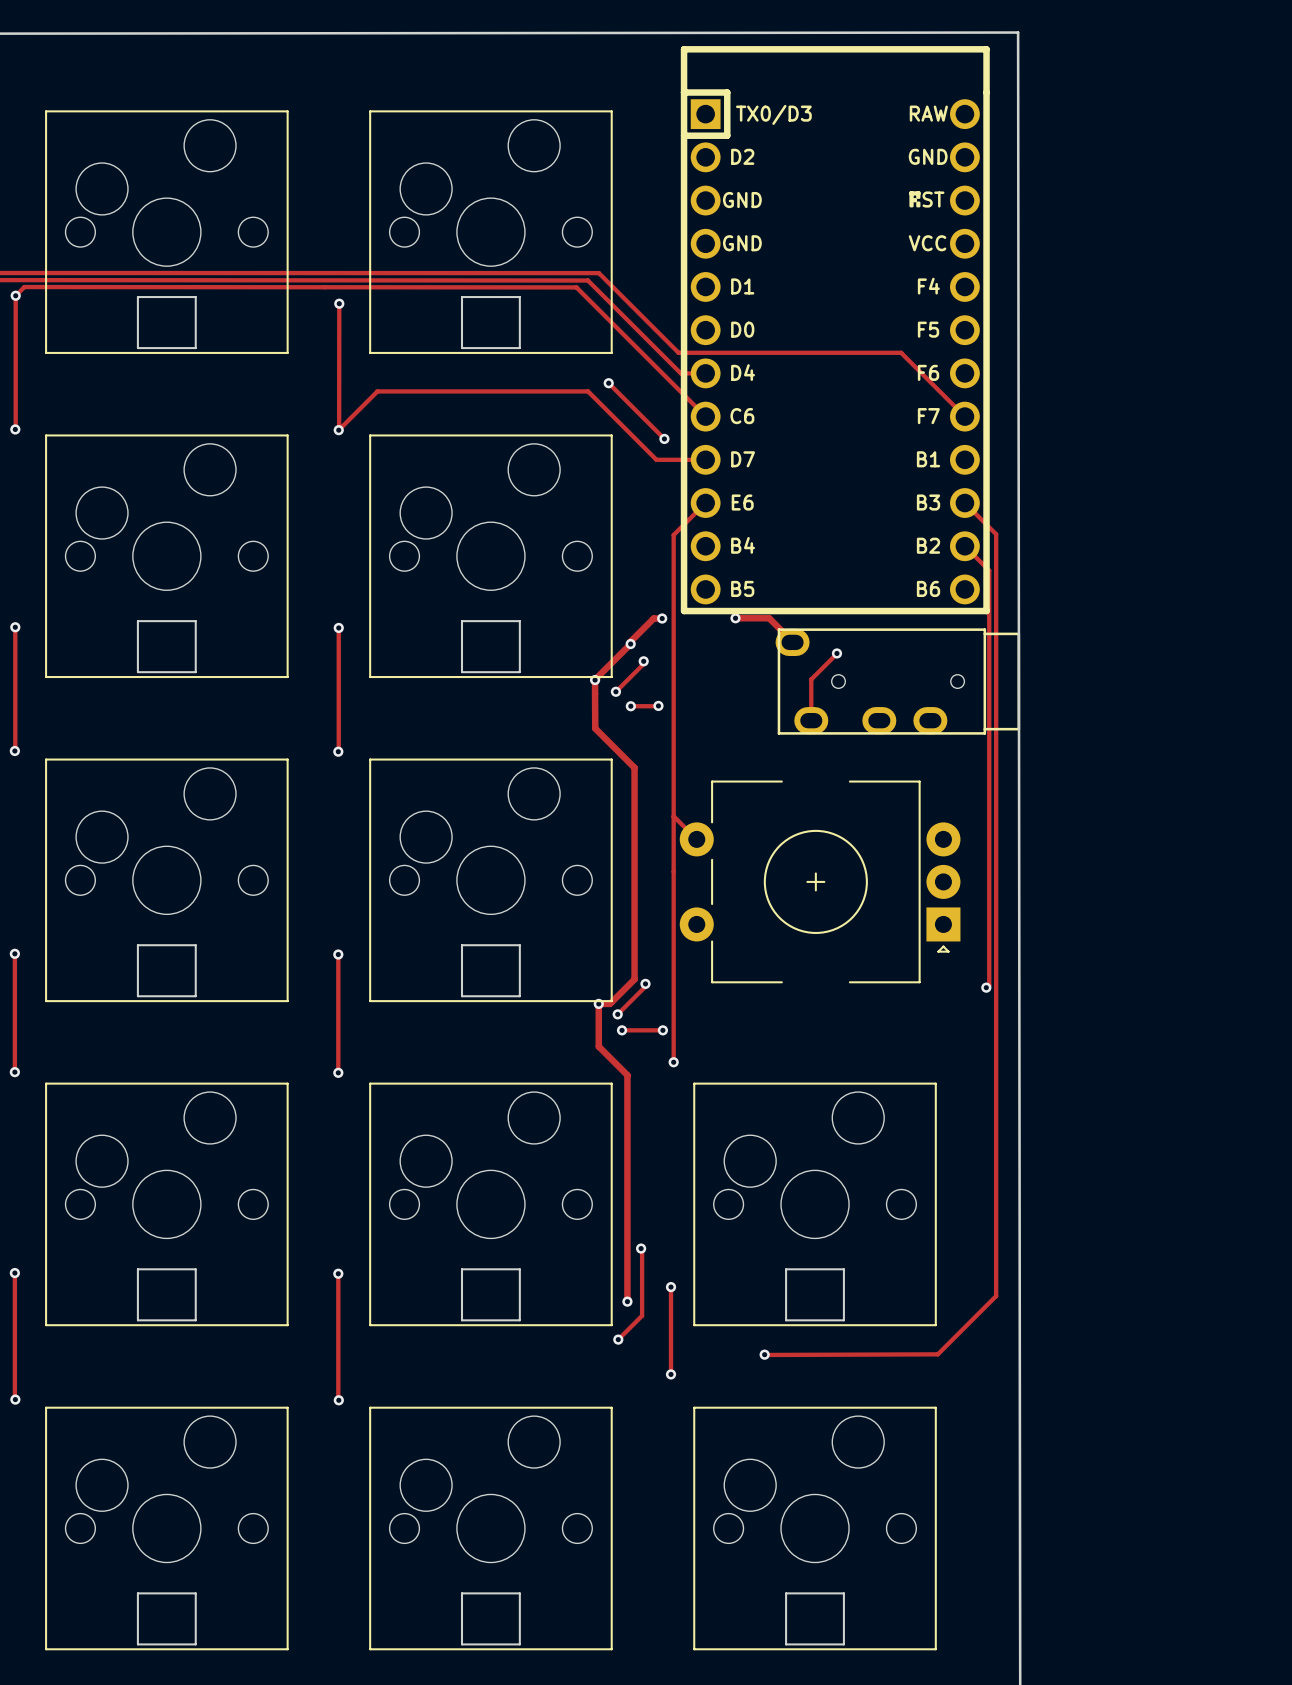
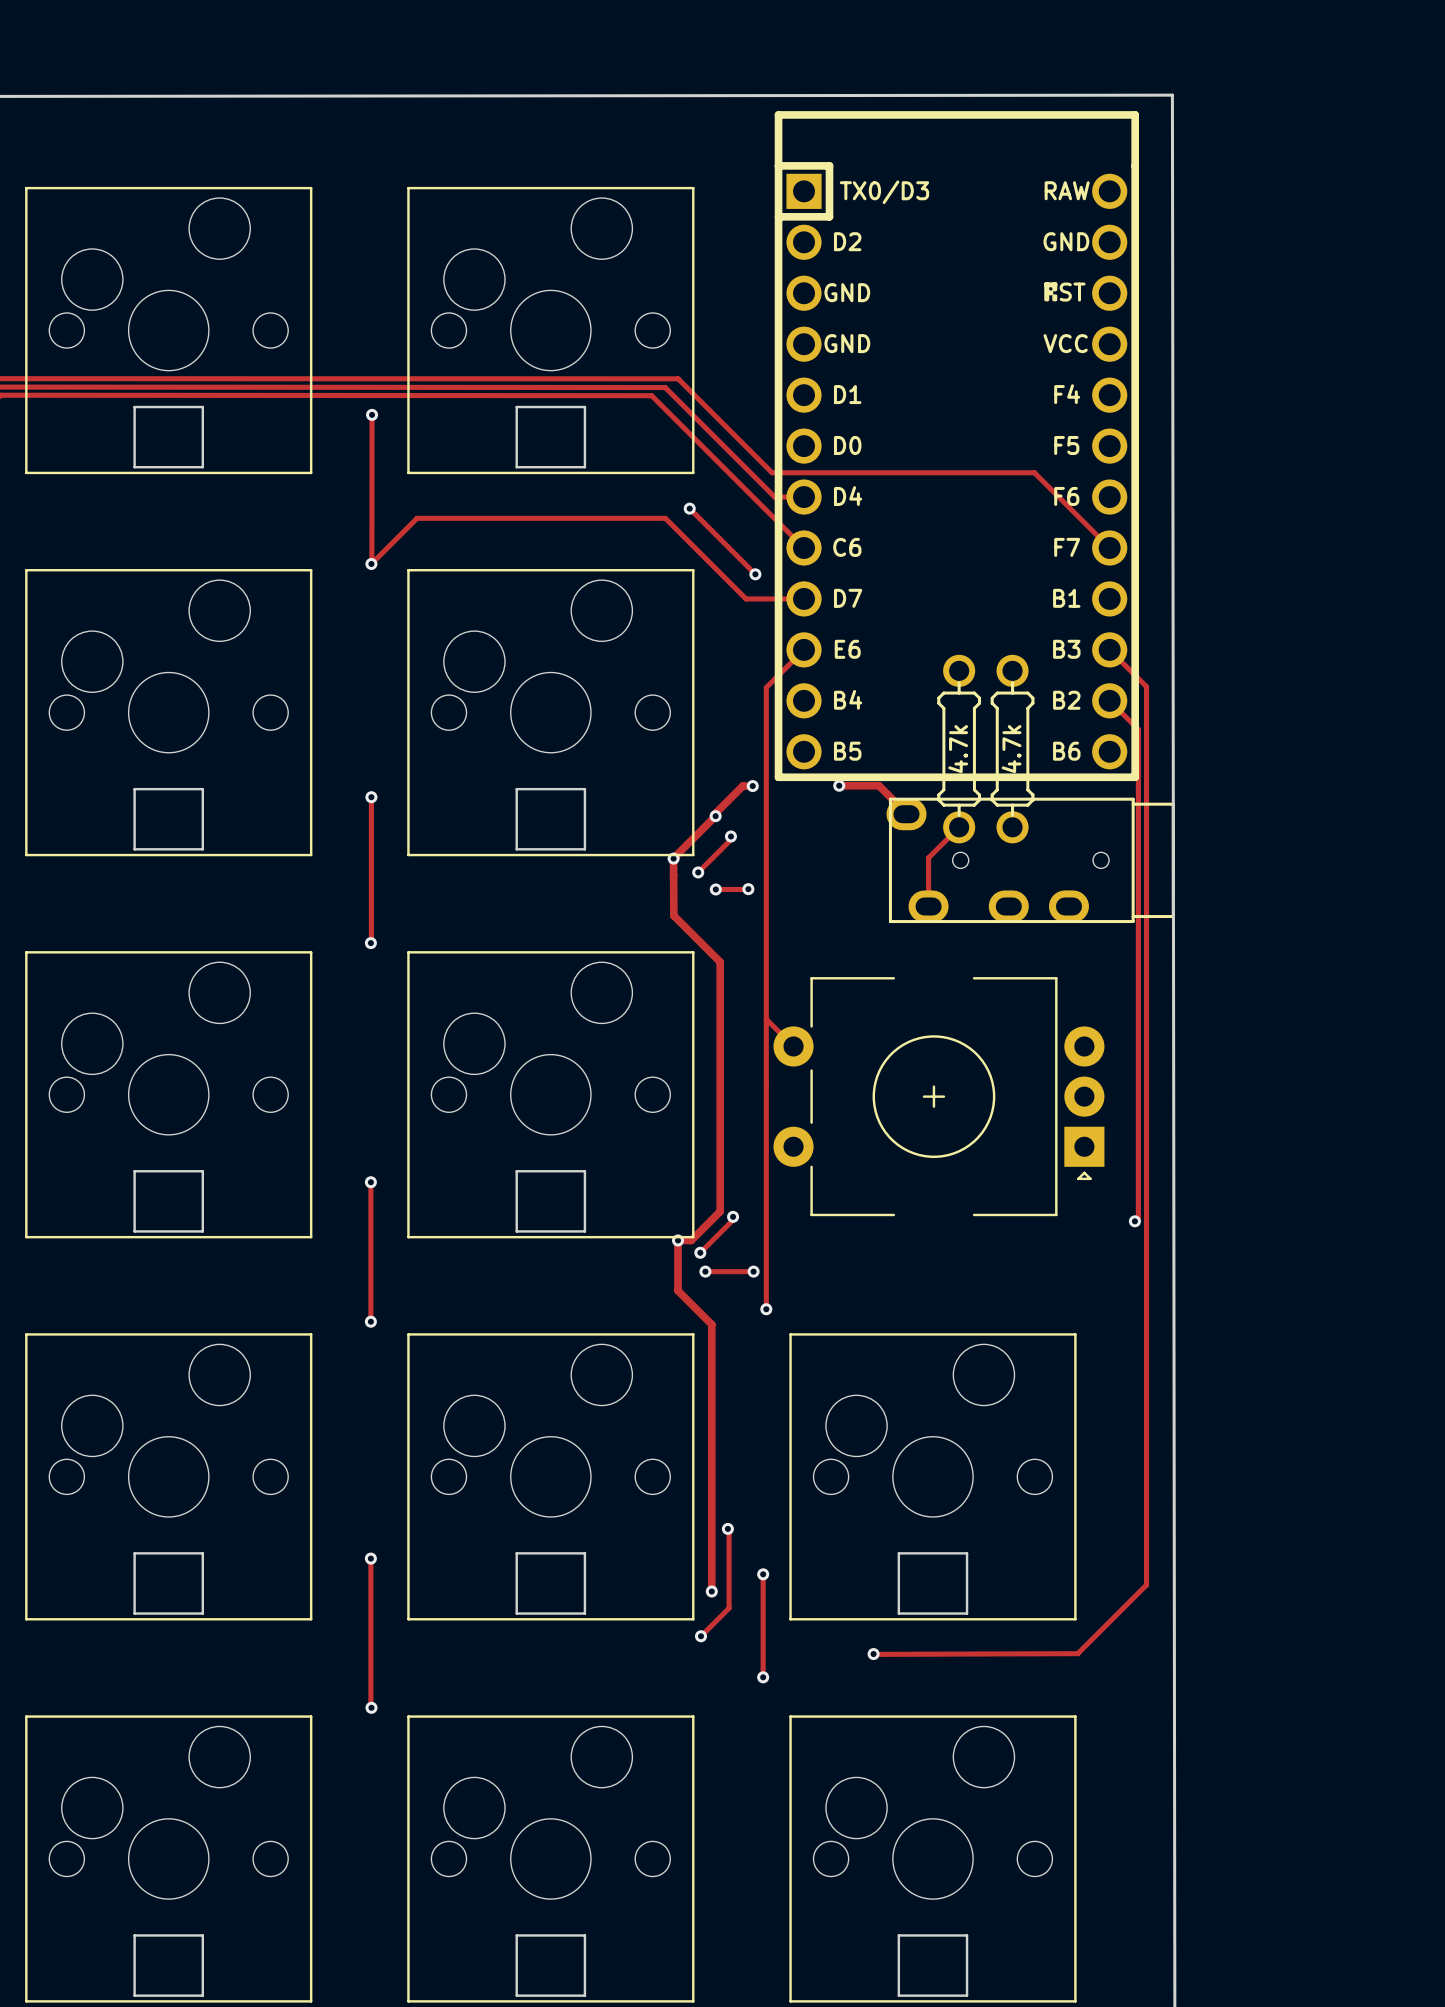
part: none -> 4.7k (959, 749)
part: none -> 4.7k (1012, 749)
via: (836, 653) -> none

